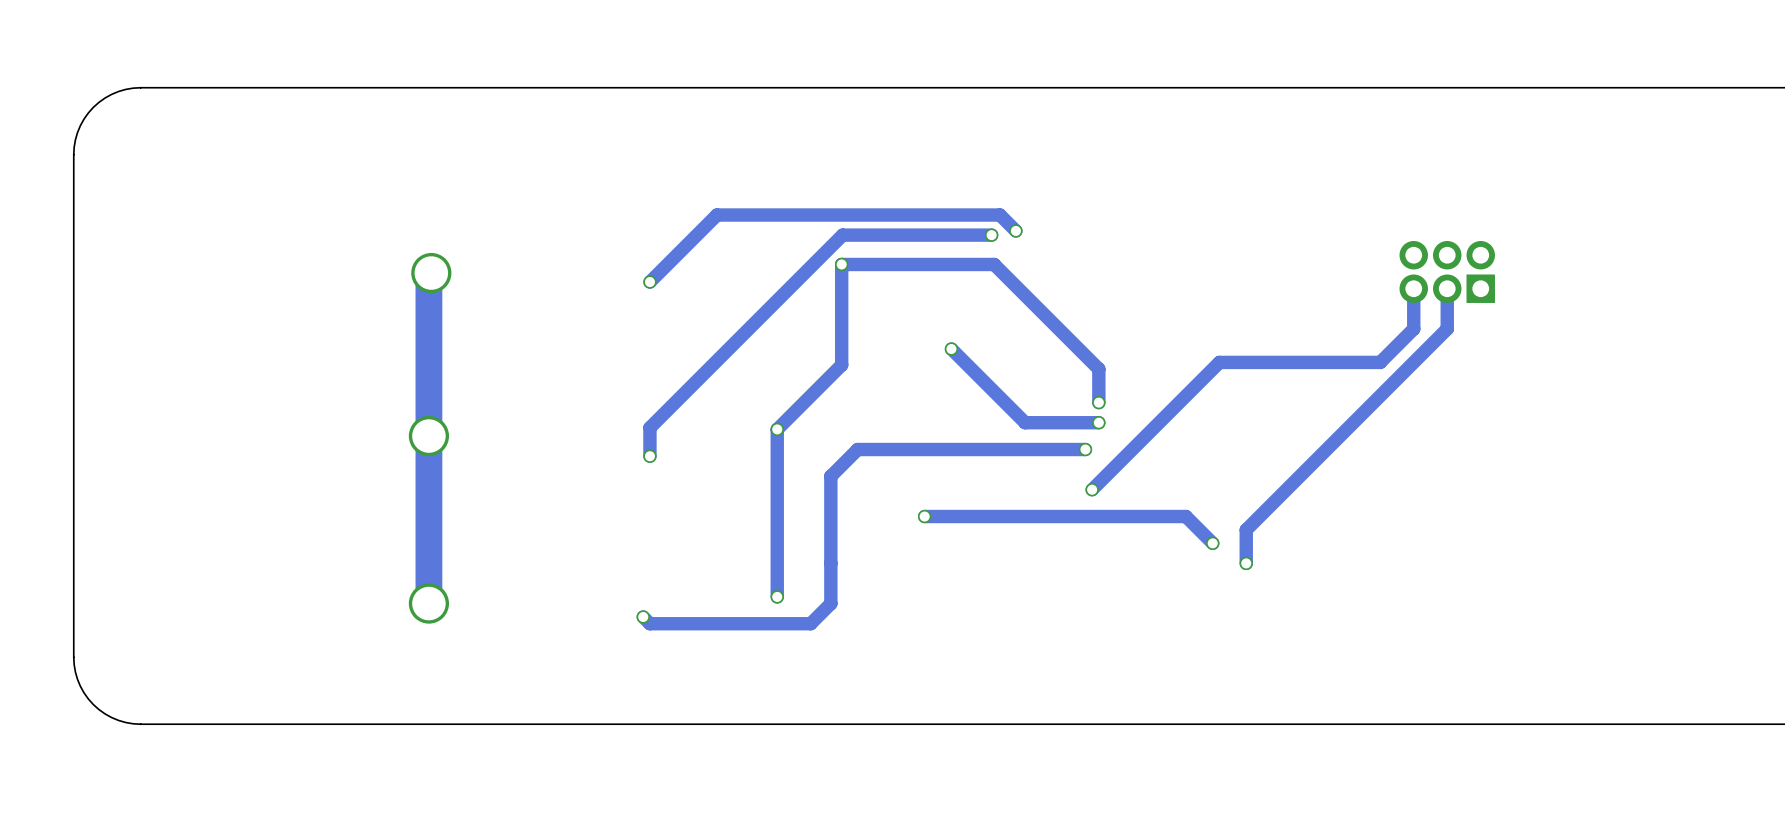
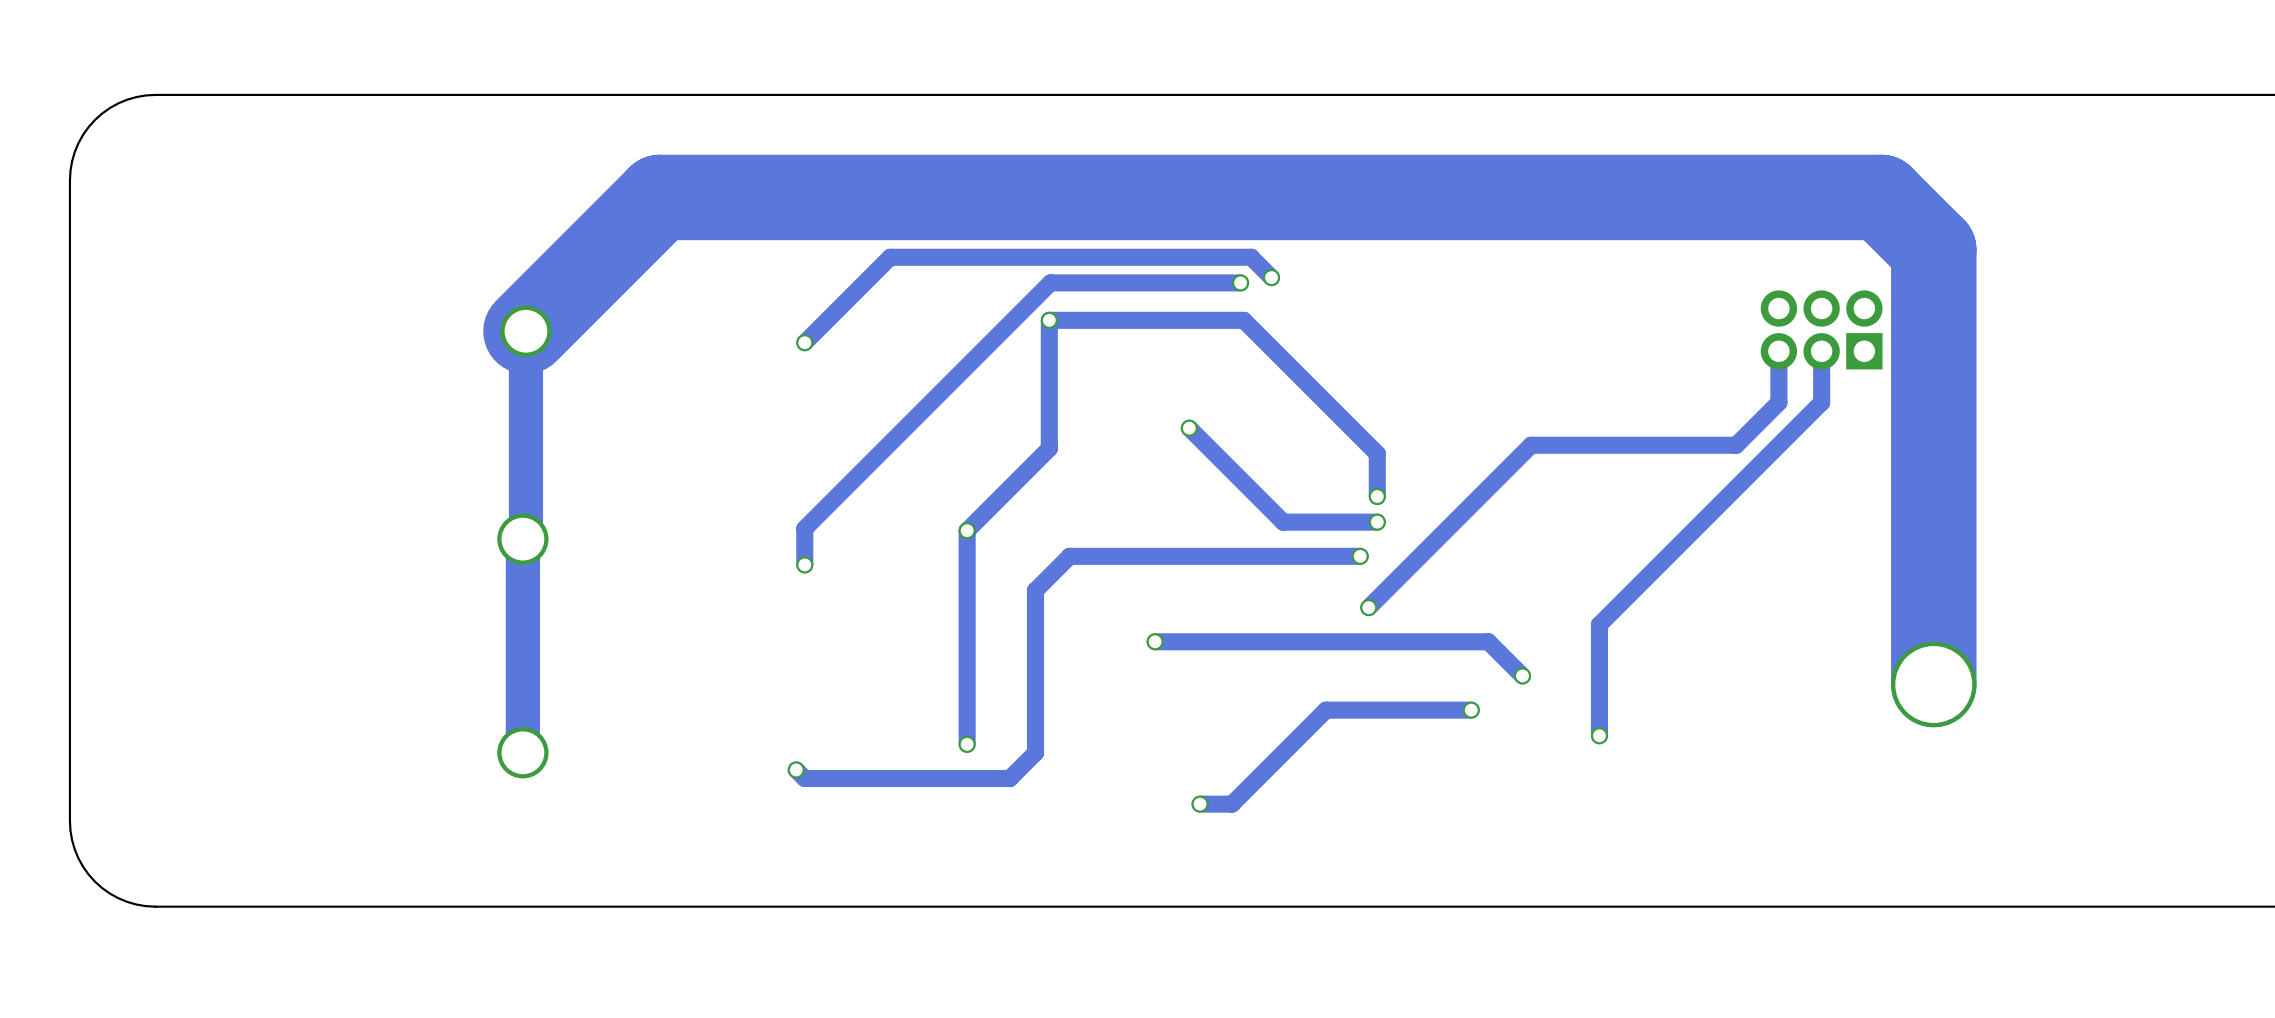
track: (428, 275) (428, 436) -> (1933, 684) (1933, 249) (1881, 197) (659, 197) (525, 331) (525, 536) (522, 539)
track: (1273, 503) (1246, 529) (1246, 563) -> (1599, 624) (1599, 735)
via: none -> (1933, 684)
via: (1246, 563) -> none
track: none -> (1471, 710) (1326, 710) (1232, 804) (1200, 804)
via: none -> (1471, 710)
via: none -> (1599, 735)
via: none -> (1200, 804)

